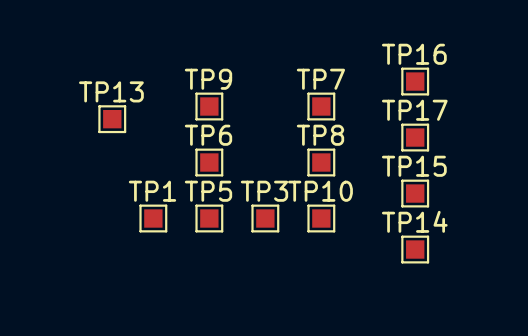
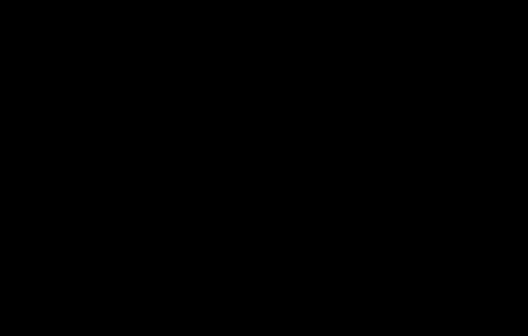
TP16: (415, 81) -> none
TP9: (209, 106) -> none
TP7: (321, 106) -> none
TP13: (112, 119) -> none
TP17: (415, 137) -> none
TP6: (209, 162) -> none
TP8: (321, 162) -> none
TP15: (415, 193) -> none
TP1: (153, 218) -> none
TP5: (209, 218) -> none
TP3: (265, 218) -> none
TP10: (321, 218) -> none
TP14: (415, 249) -> none

